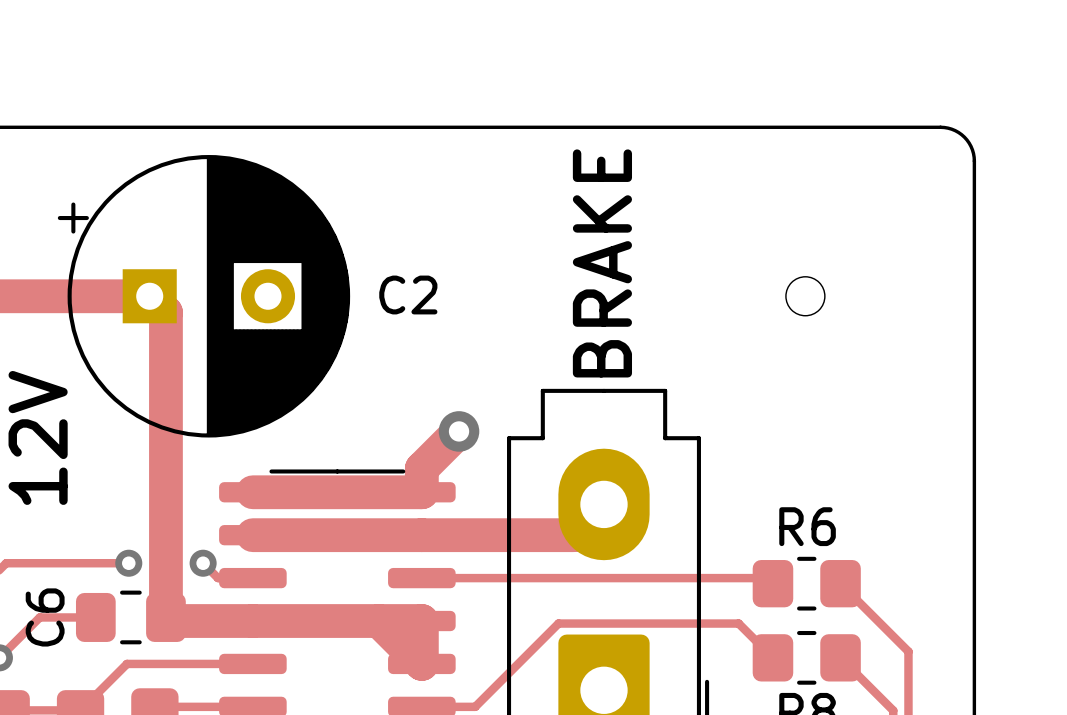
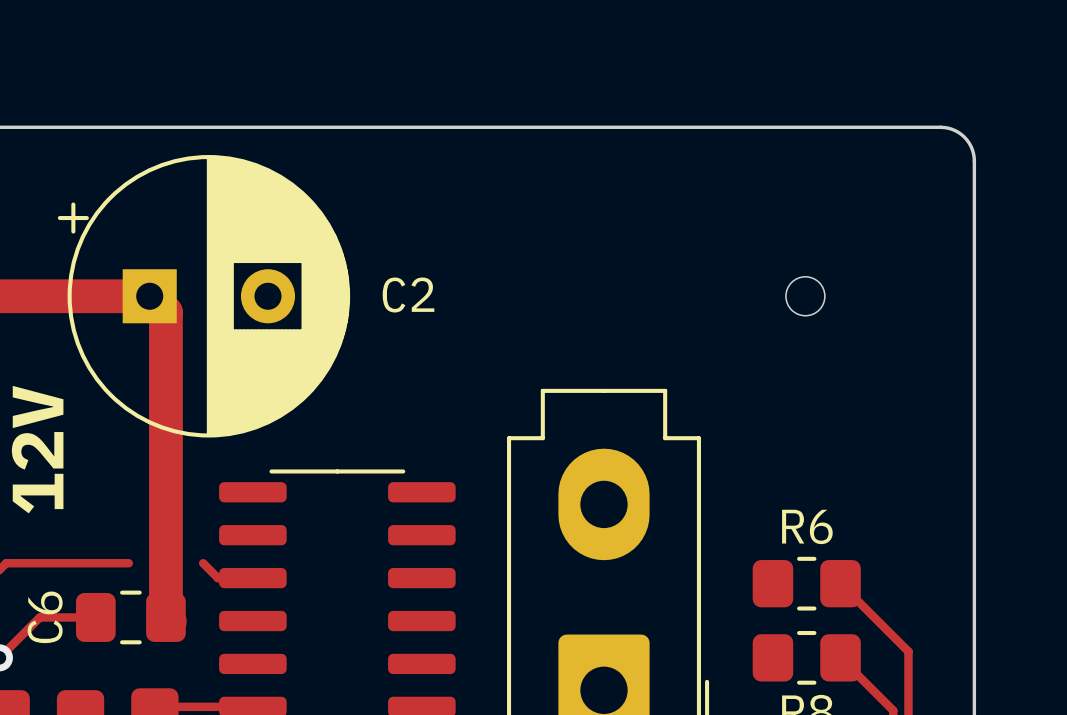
text: BRAKE (602, 263) -> none
track: (459, 431) (421, 468) (421, 492) (252, 492) -> none
via: (459, 431) -> none
track: (603, 504) (573, 535) (252, 535) -> none
via: (128, 563) -> none
via: (203, 563) -> none
track: (421, 578) (767, 578) (772, 583) -> none
track: (169, 621) (421, 621) (421, 663) (378, 621) -> none
track: (772, 657) (738, 623) (558, 623) (475, 706) (421, 706) -> none
track: (252, 663) (127, 663) (80, 710) (6, 710) -> none

